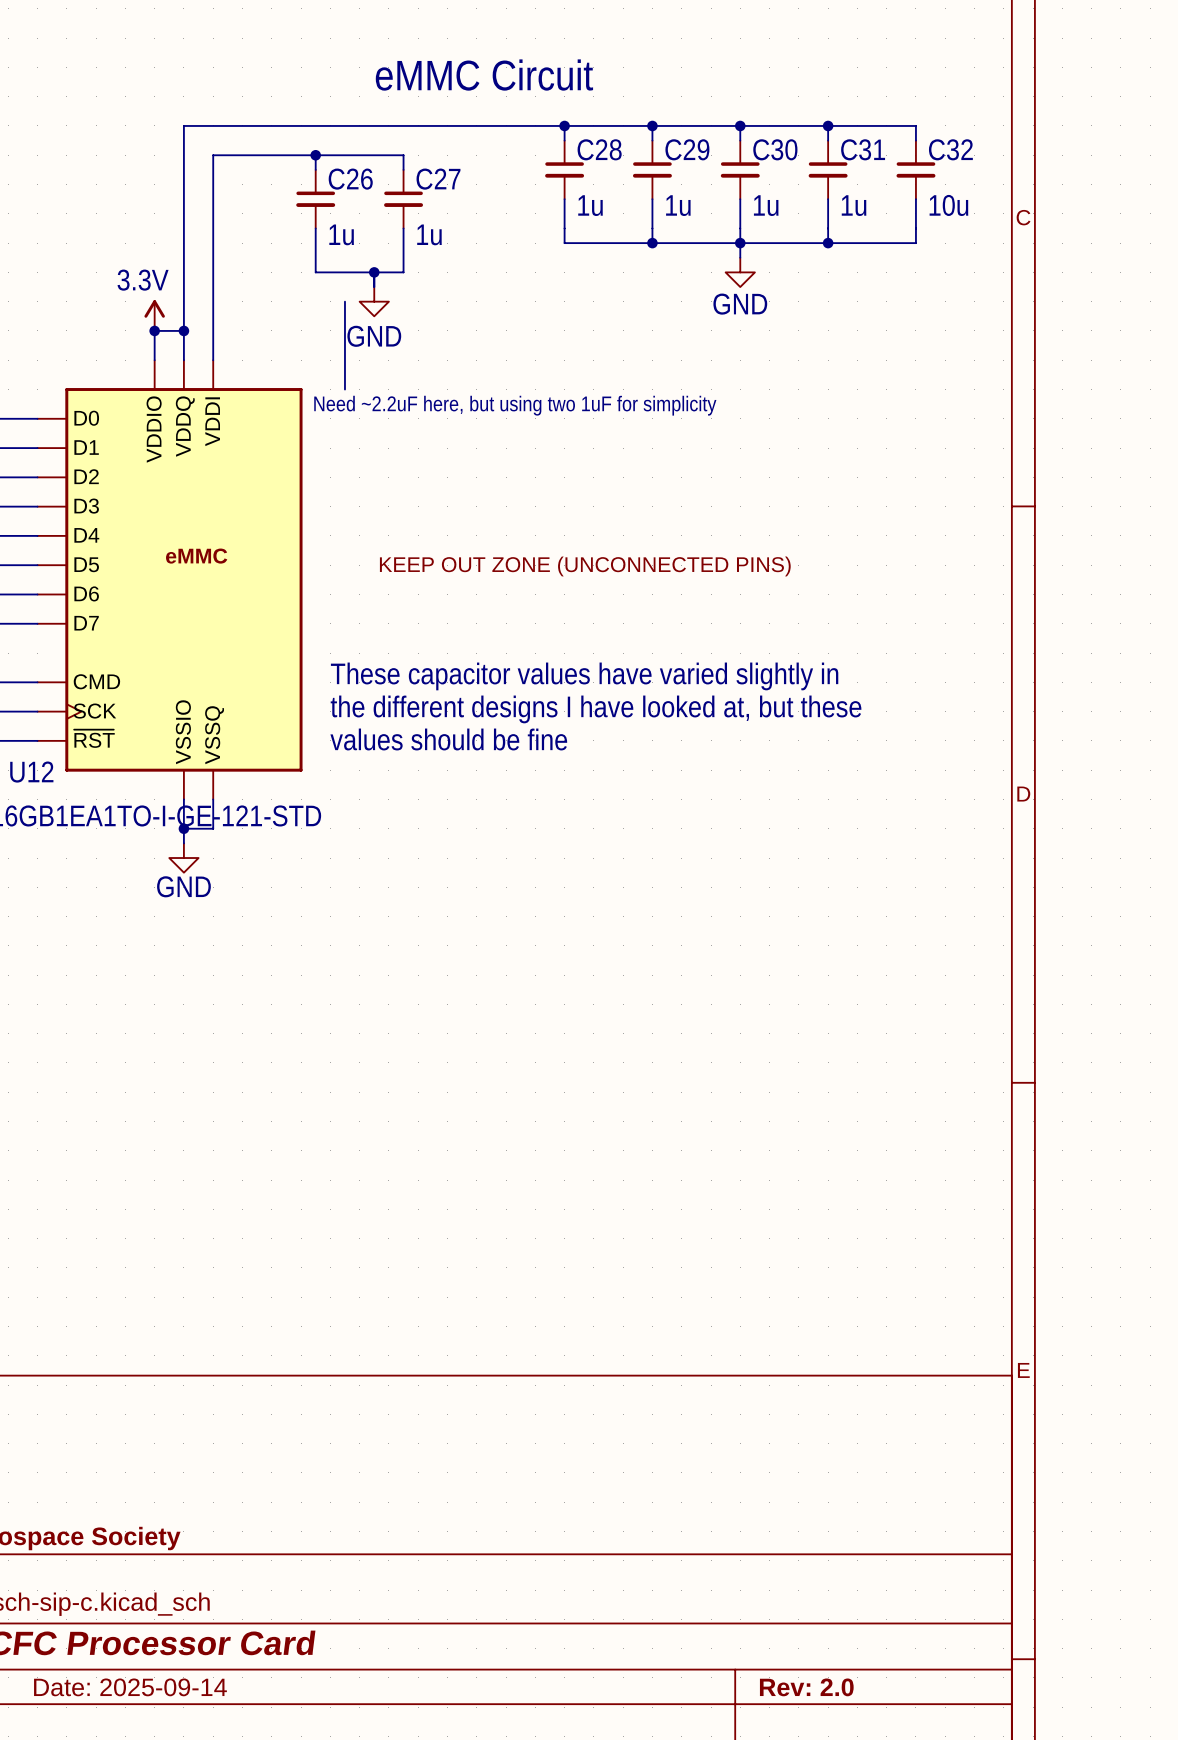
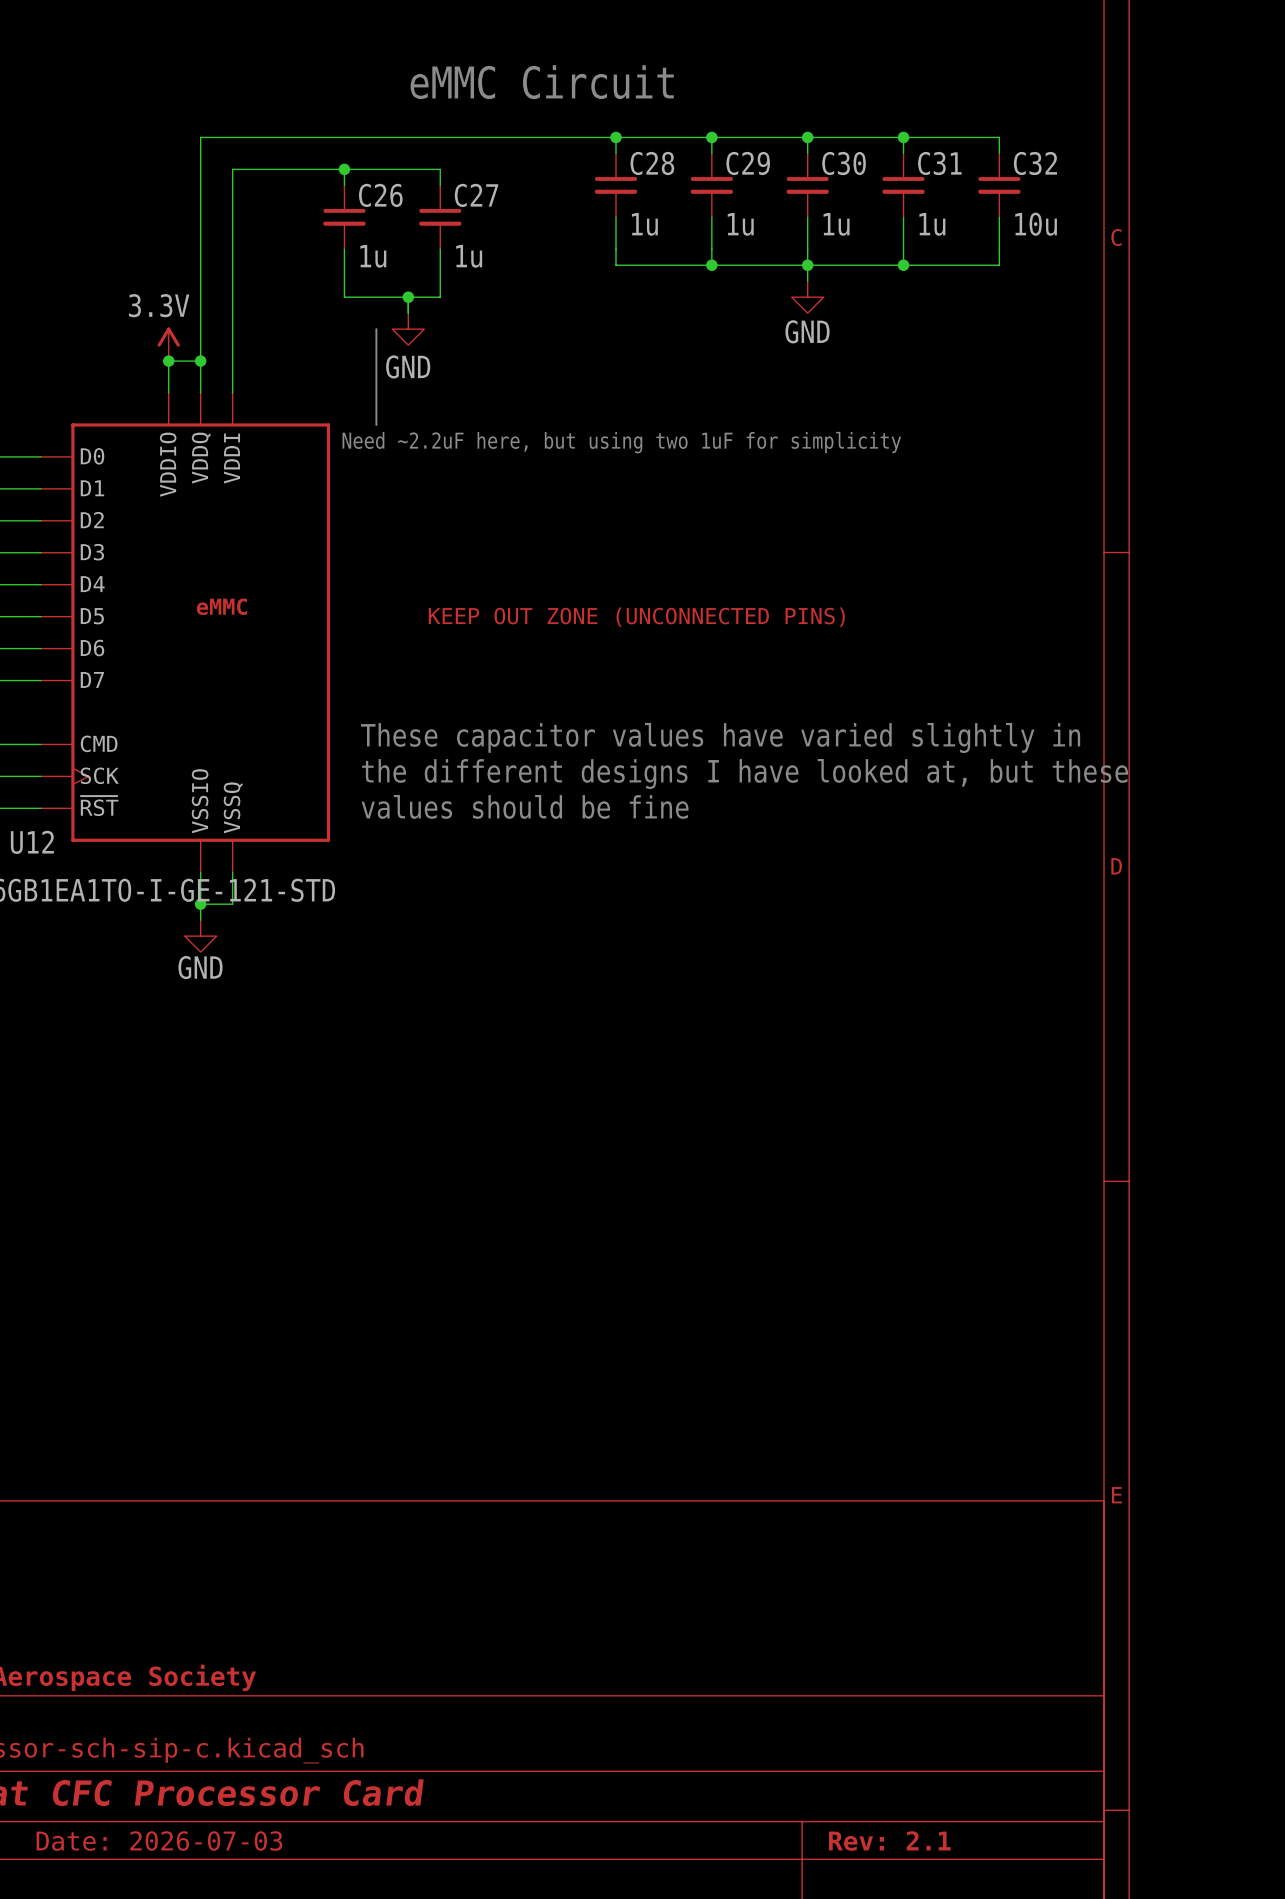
title block: Date: 2025-09-14 (130, 1687) -> Date: 2026-07-03 (159, 1841)
title block: Rev: 2.0 (806, 1687) -> Rev: 2.1 (889, 1841)

